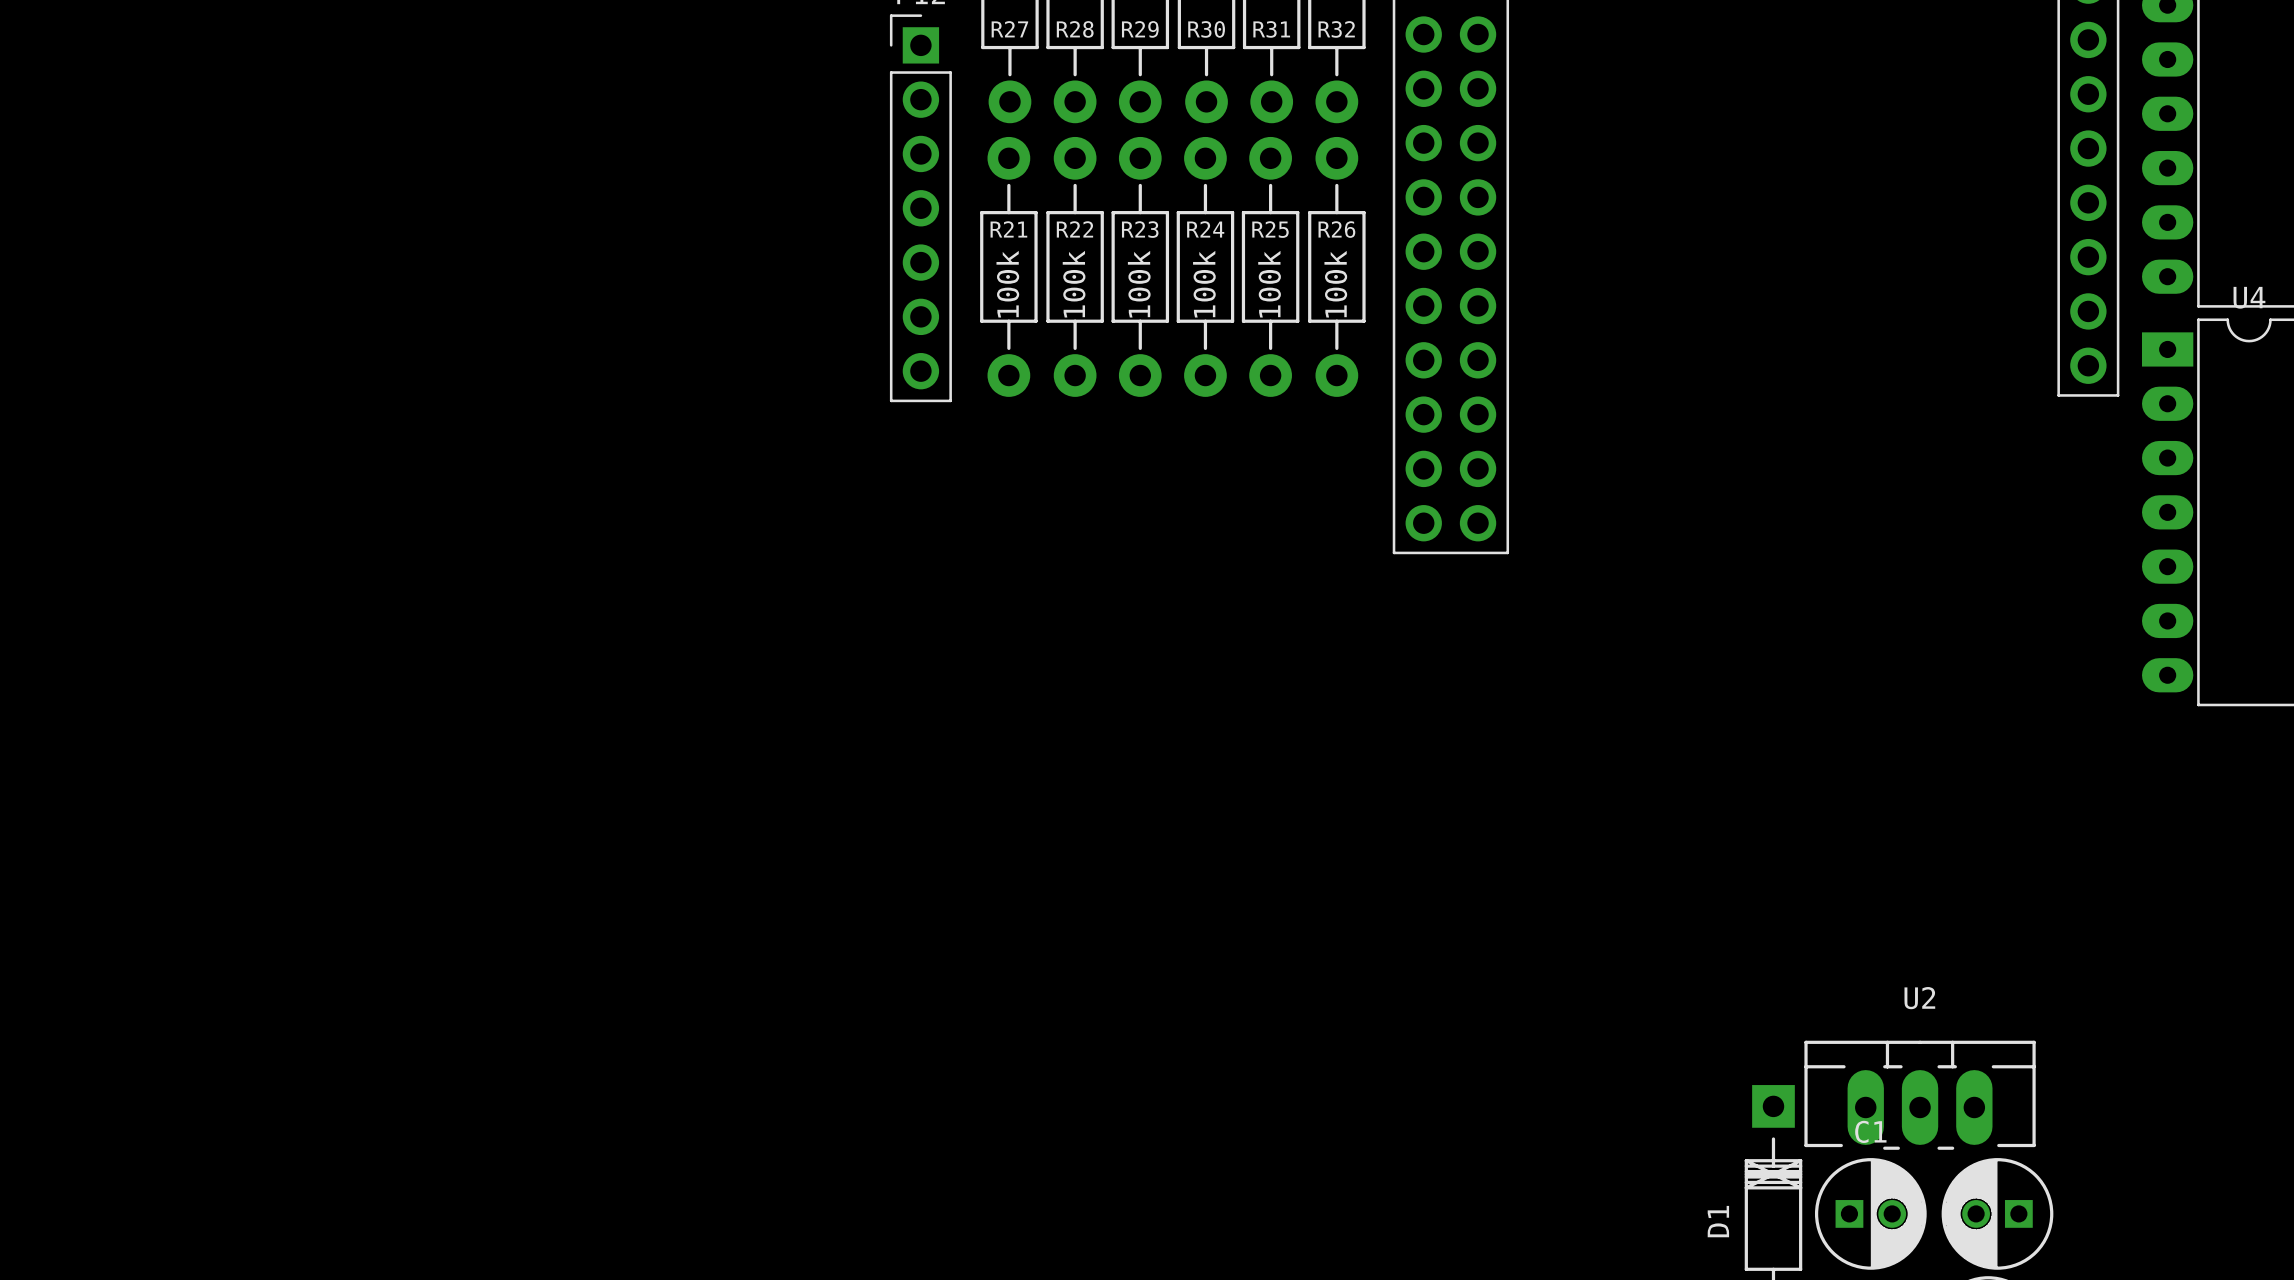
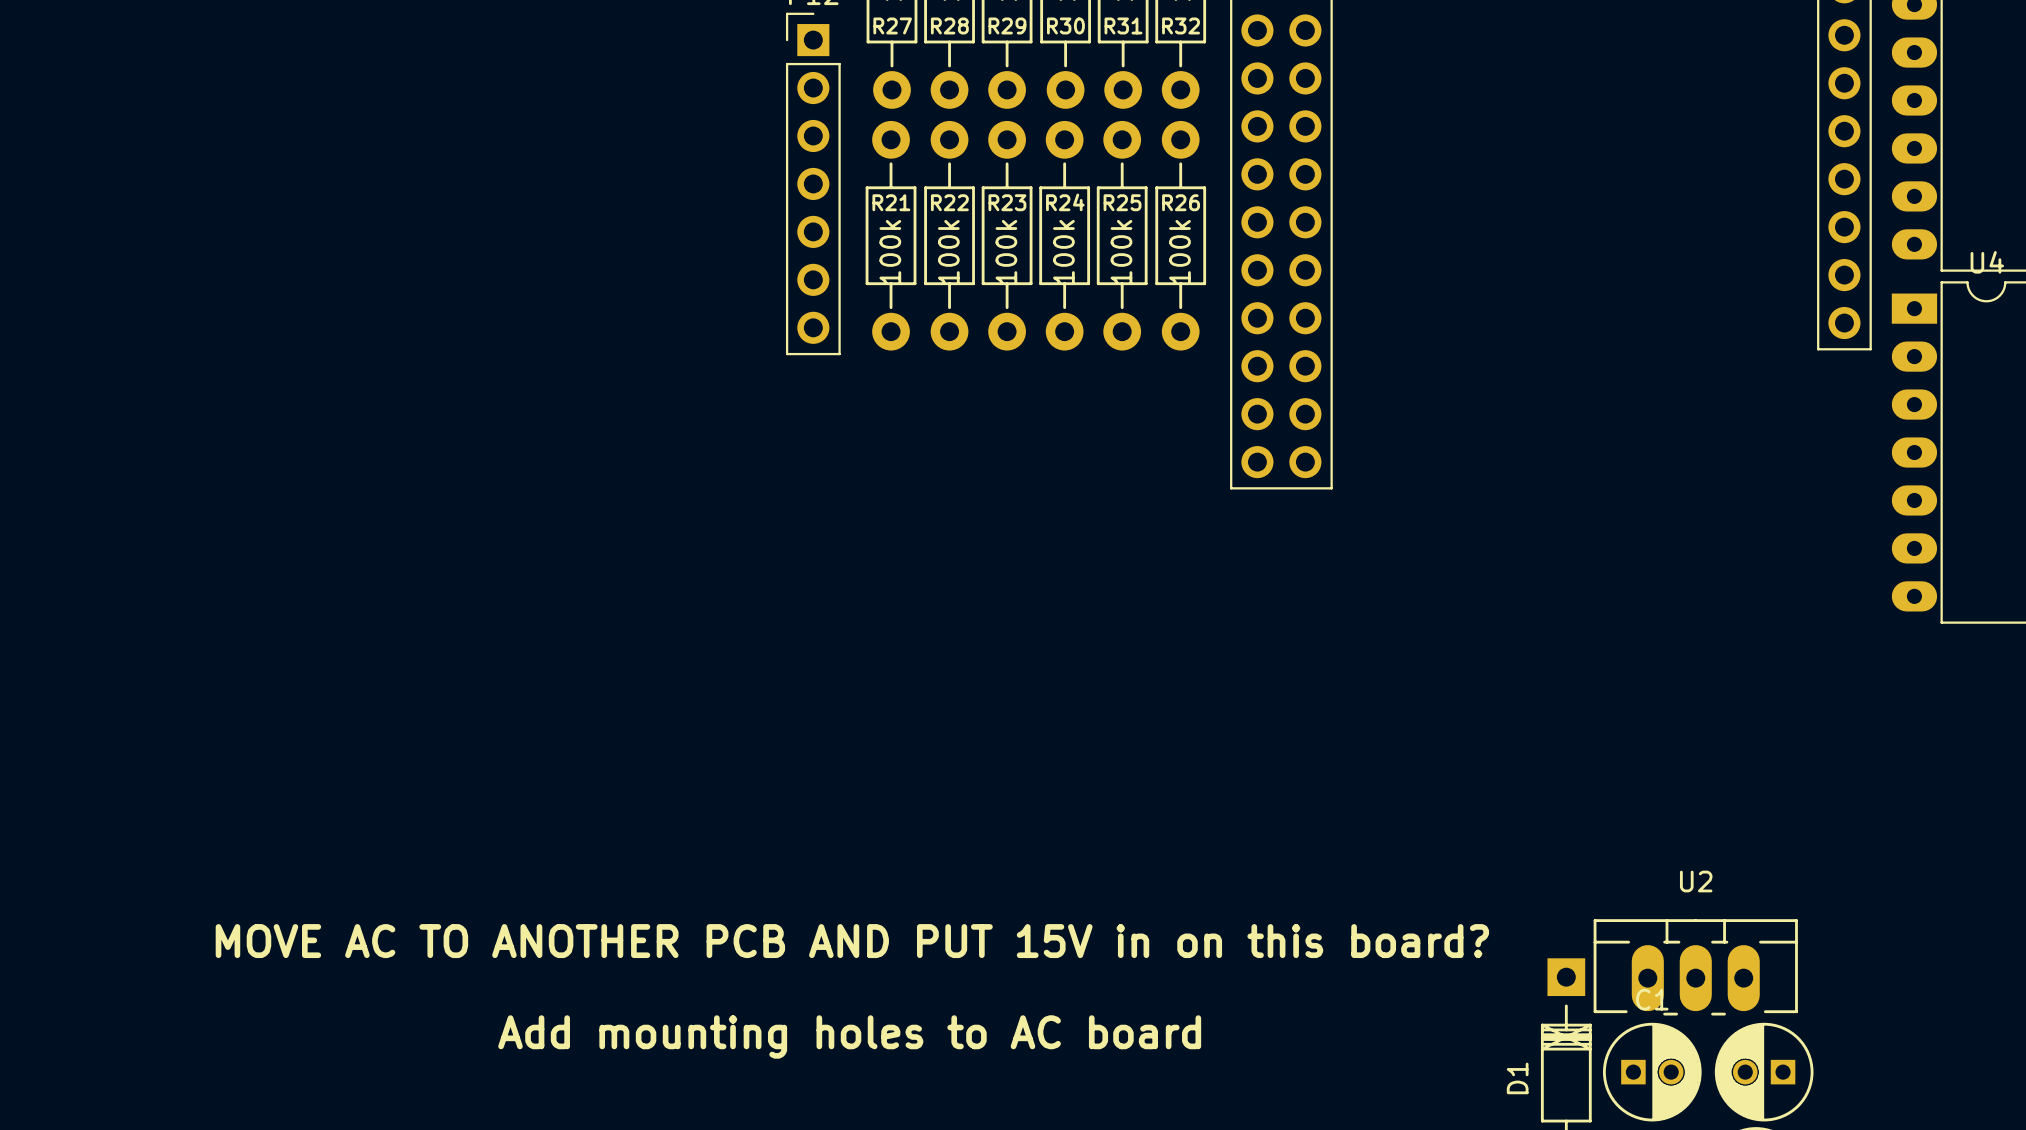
text: none -> MOVE AC TO ANOTHER PCB AND PUT 15V in on this board? (852, 941)
text: none -> Add mounting holes to AC board (849, 1036)

